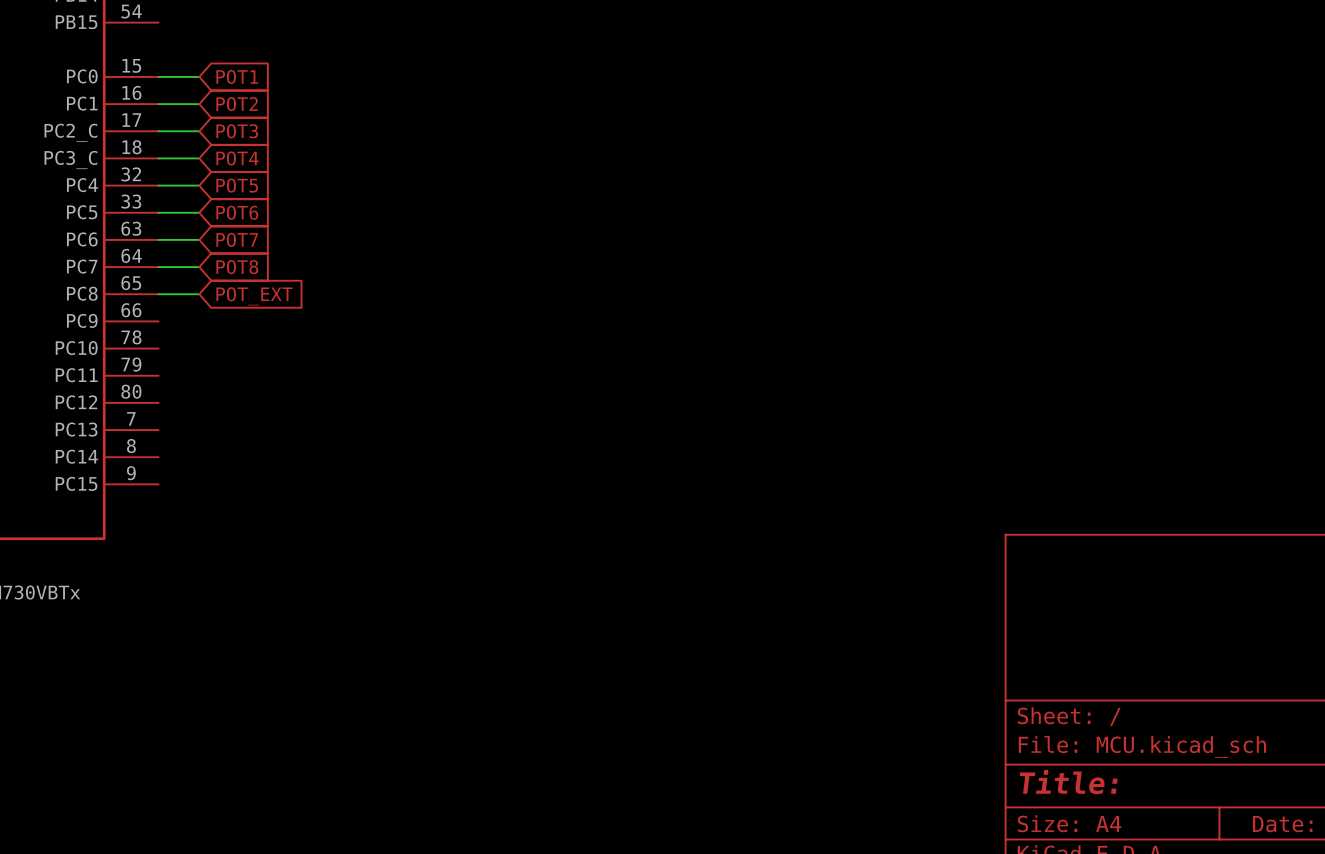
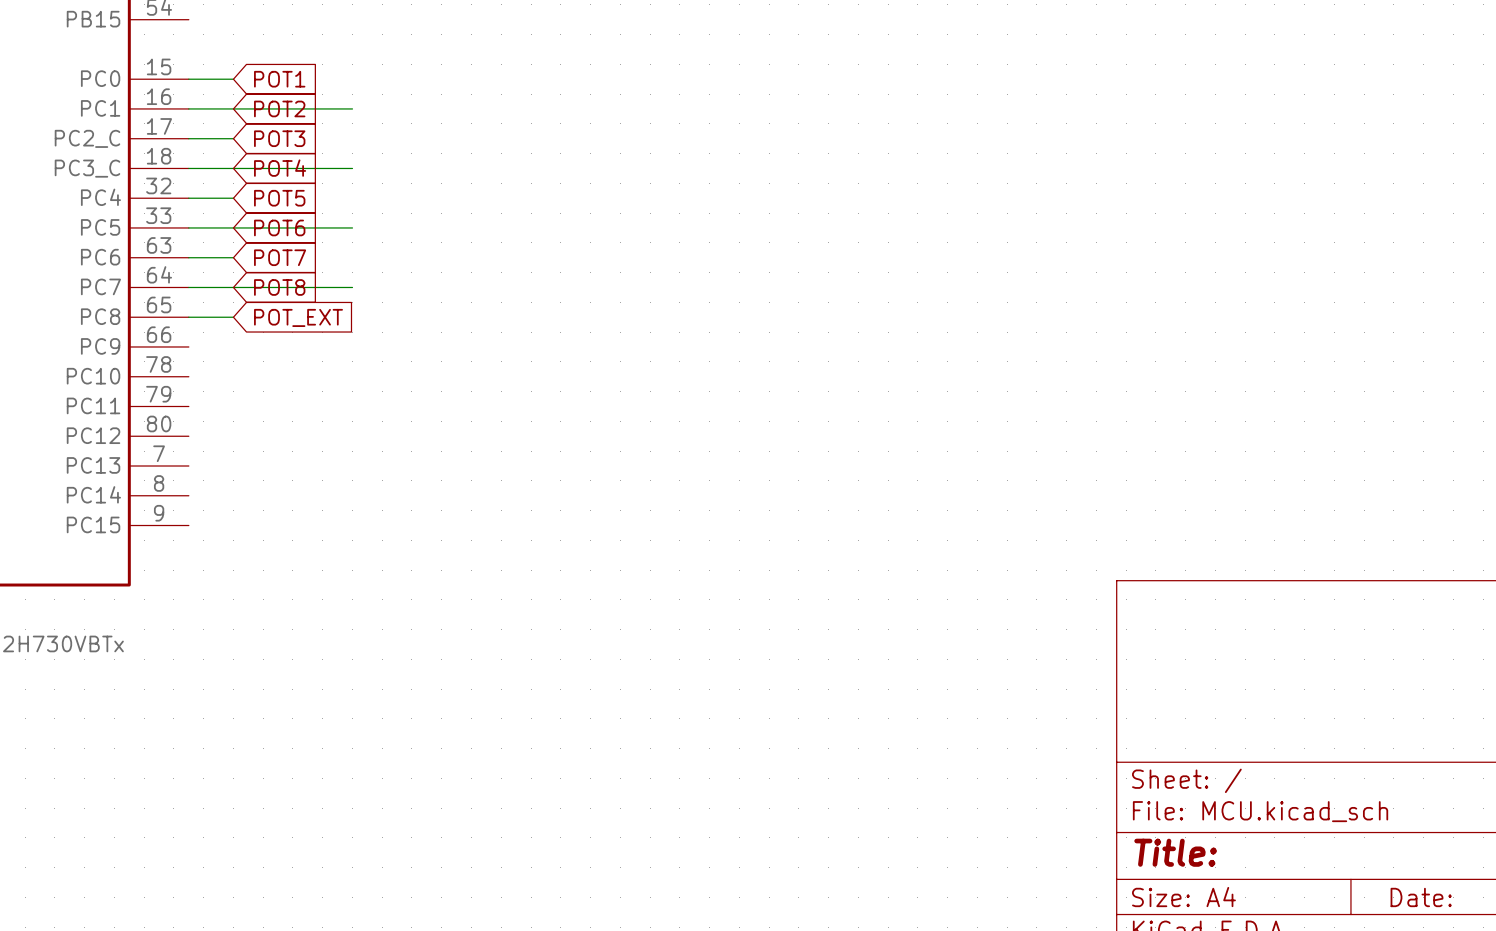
wire: none -> (233, 108) (352, 108)
wire: none -> (233, 168) (352, 168)
wire: none -> (233, 227) (352, 227)
wire: none -> (233, 287) (352, 287)

